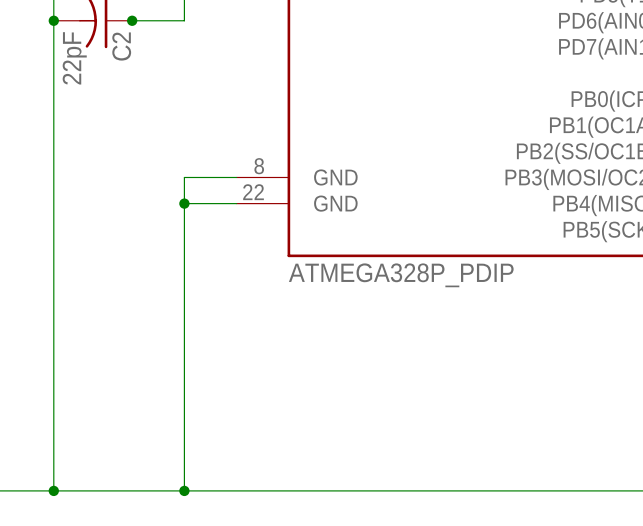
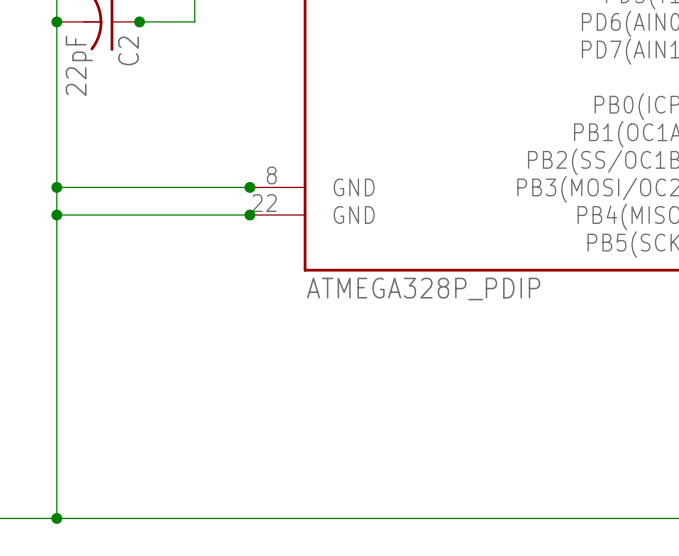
junction: none -> (56, 187)
wire: (184, 177) (184, 490) -> (194, 187) (56, 187)
junction: none -> (249, 187)
wire: none -> (56, 215) (194, 215)
junction: none -> (56, 215)
junction: (184, 203) -> none
junction: none -> (249, 215)
junction: (184, 490) -> none

